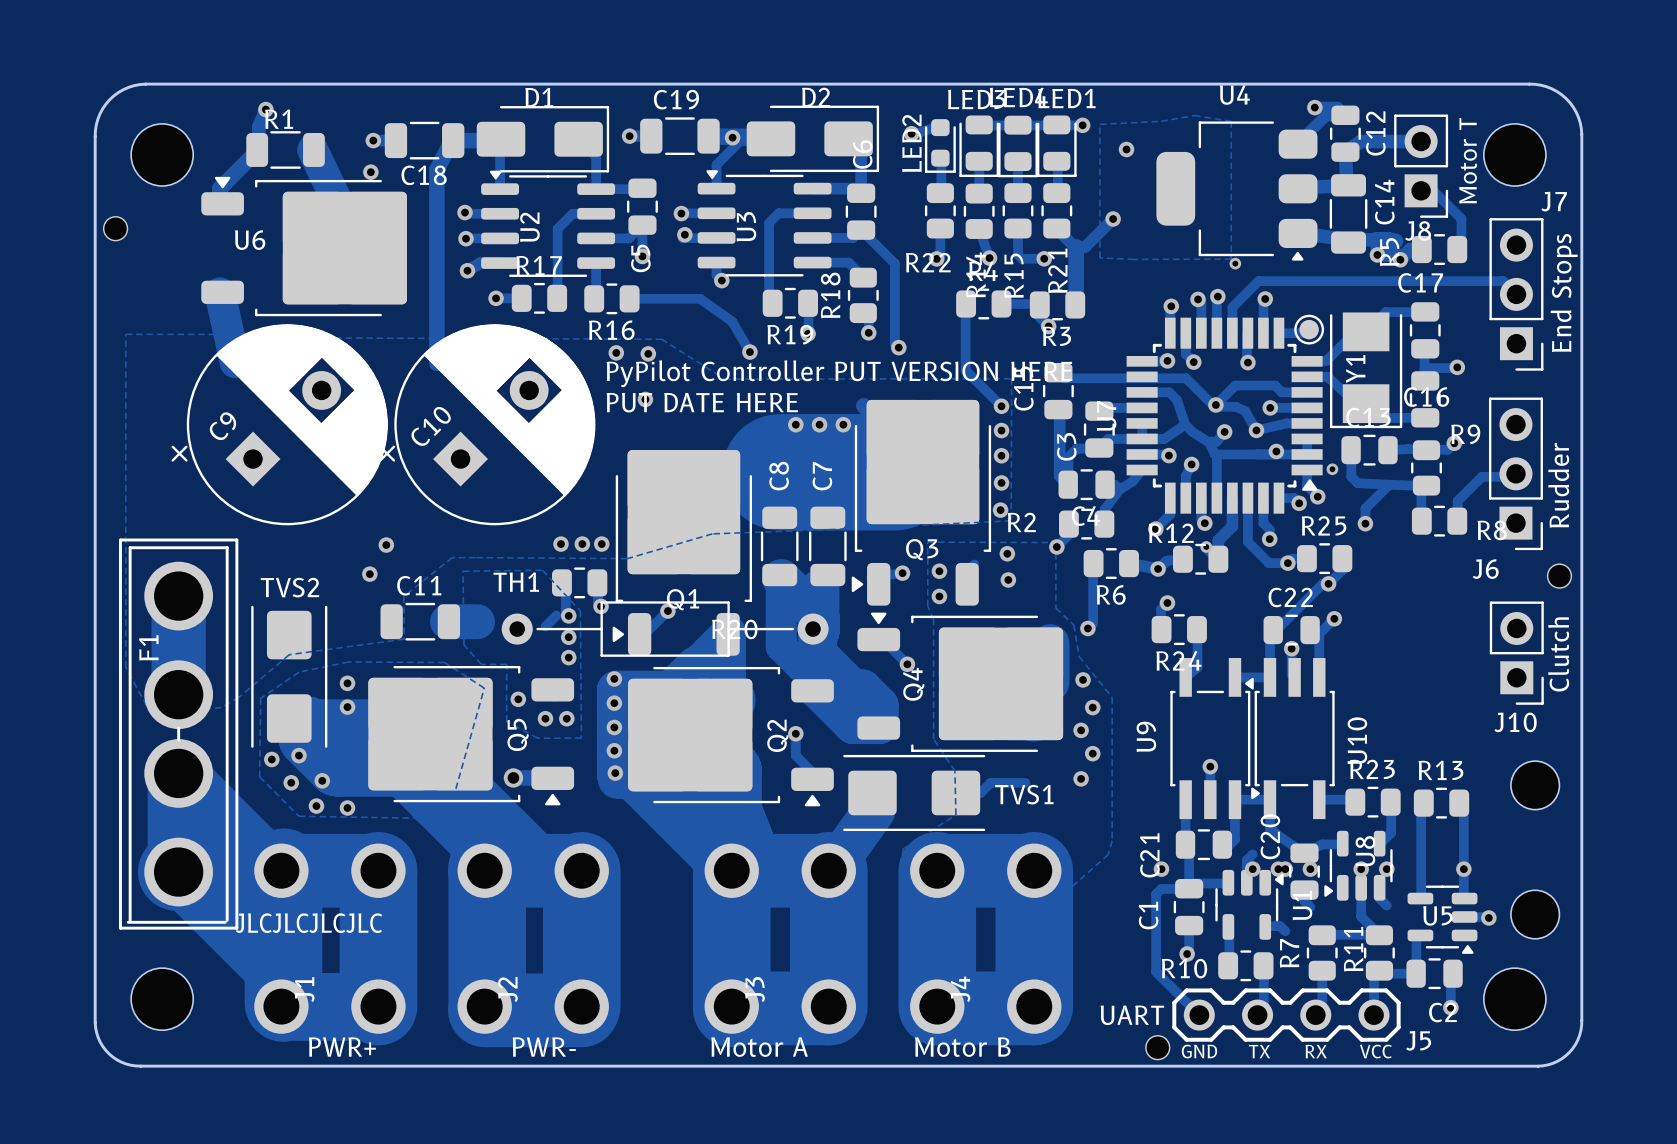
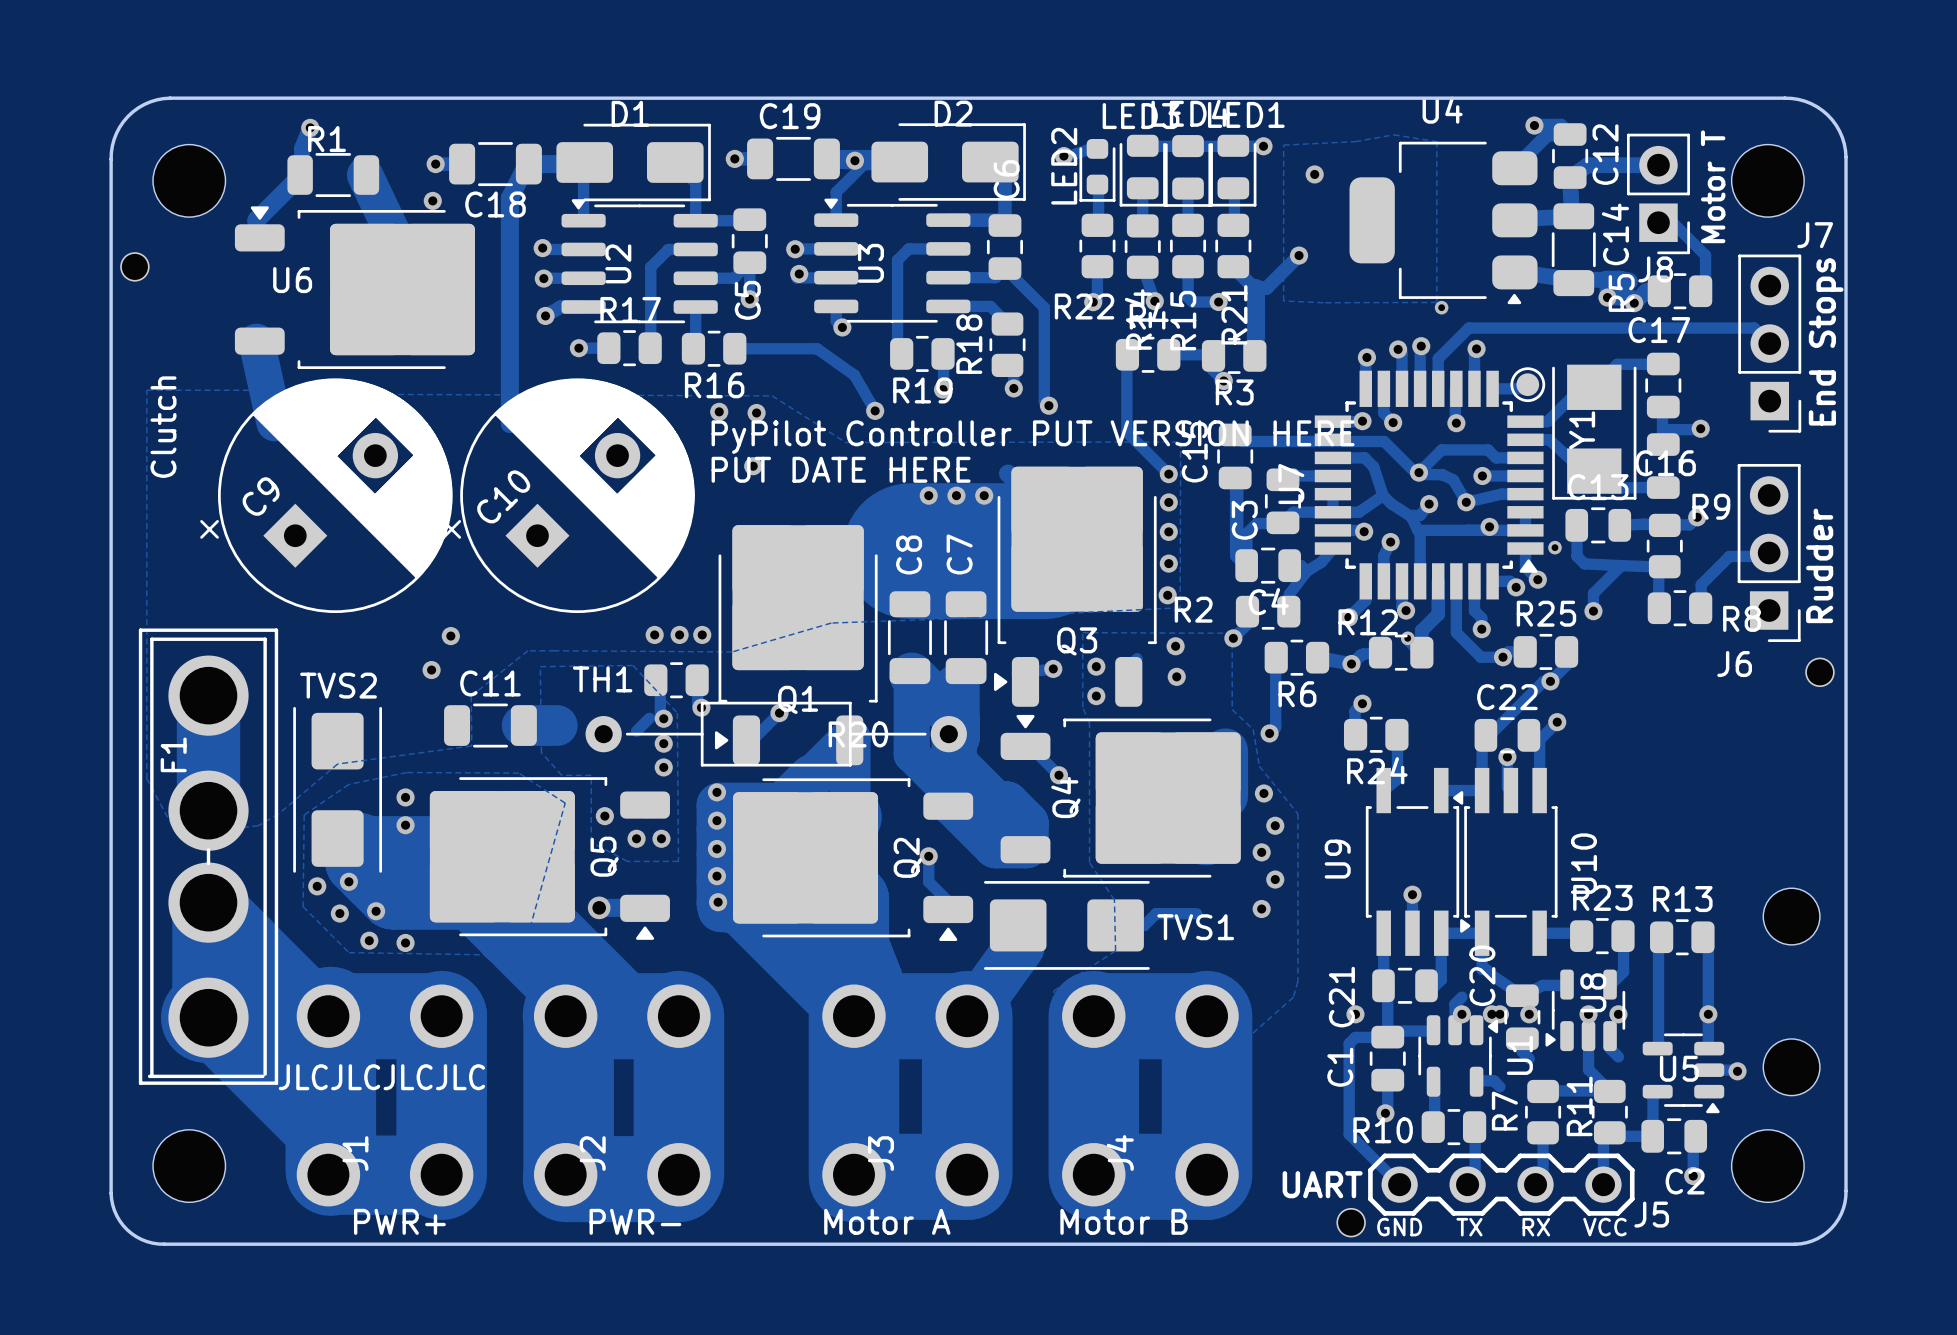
text: none -> Clutch (163, 427)
J10: (1516, 653) -> none
text: Clutch (1558, 654) -> none

